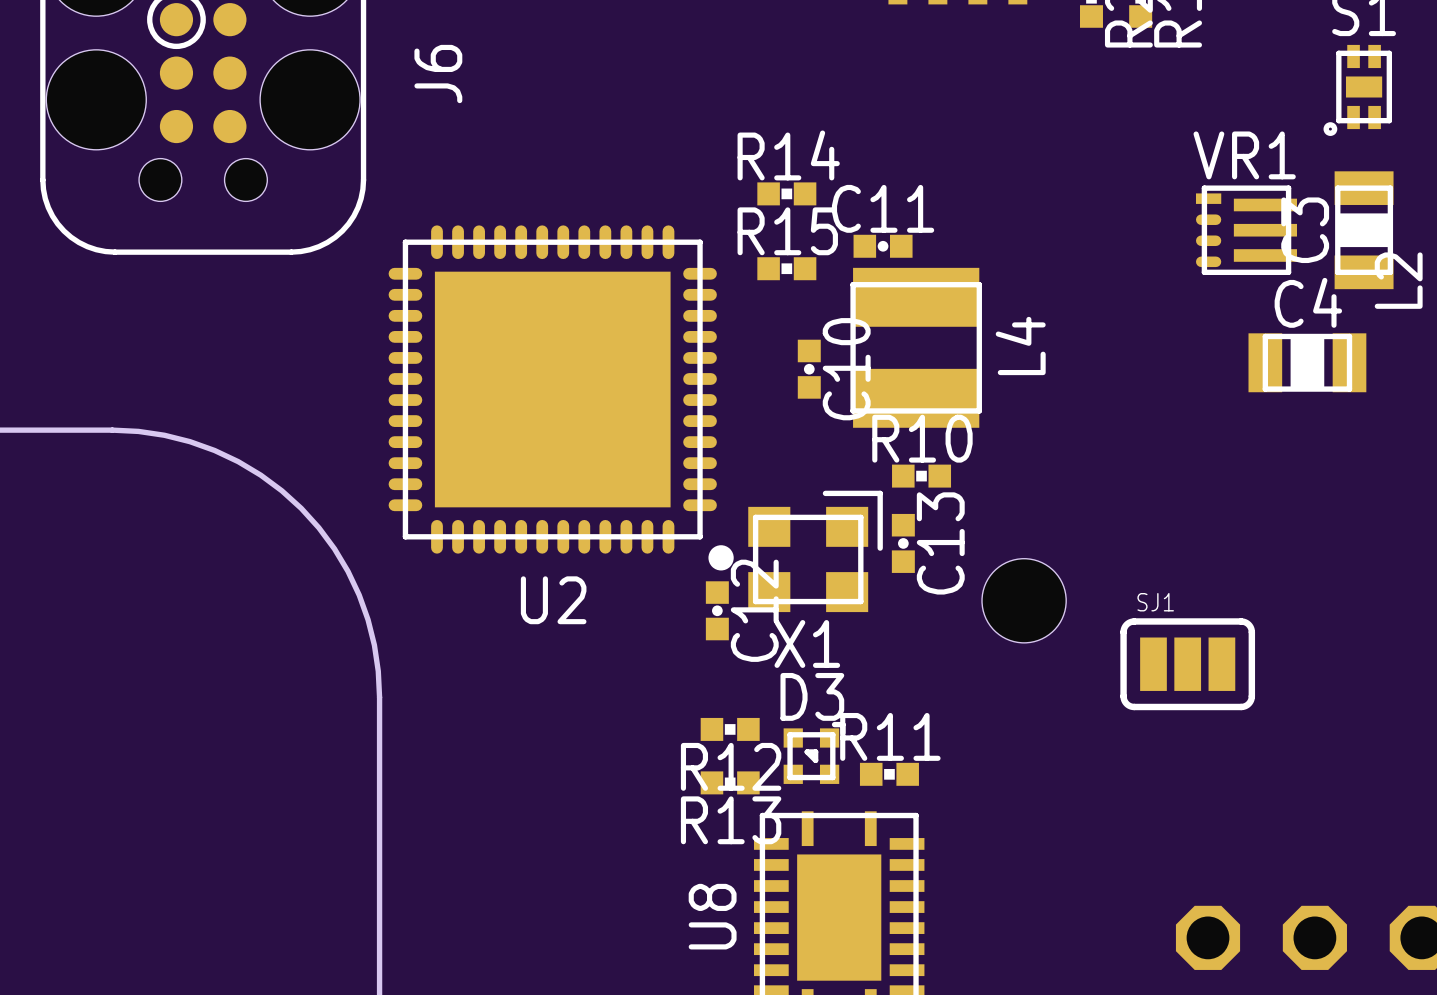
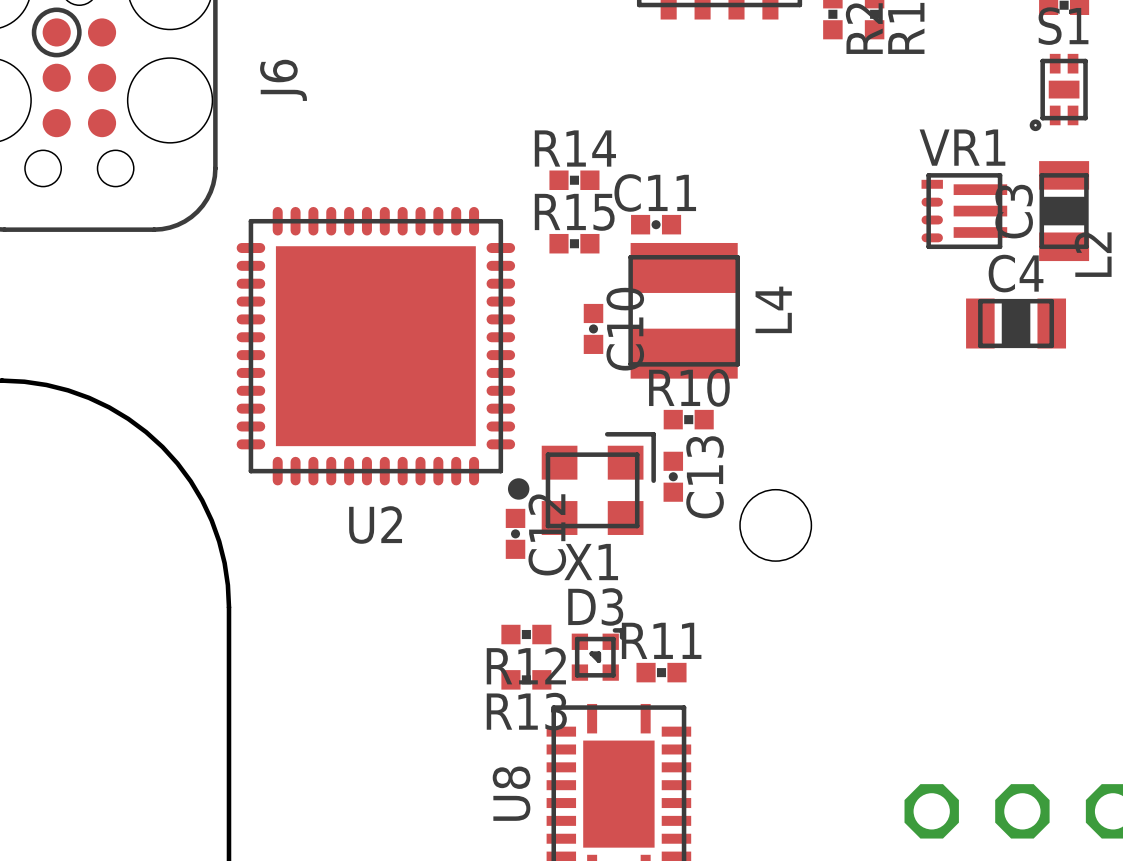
SJ1: (1187, 664) -> none

